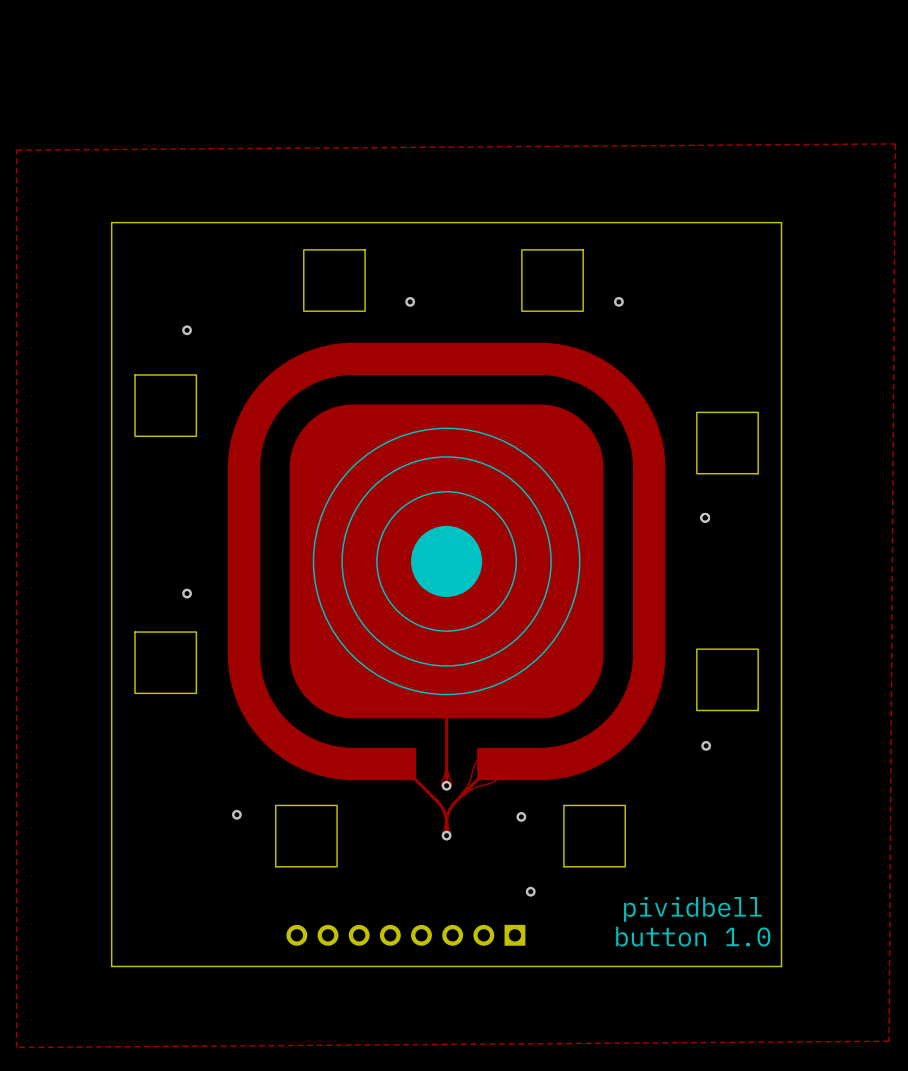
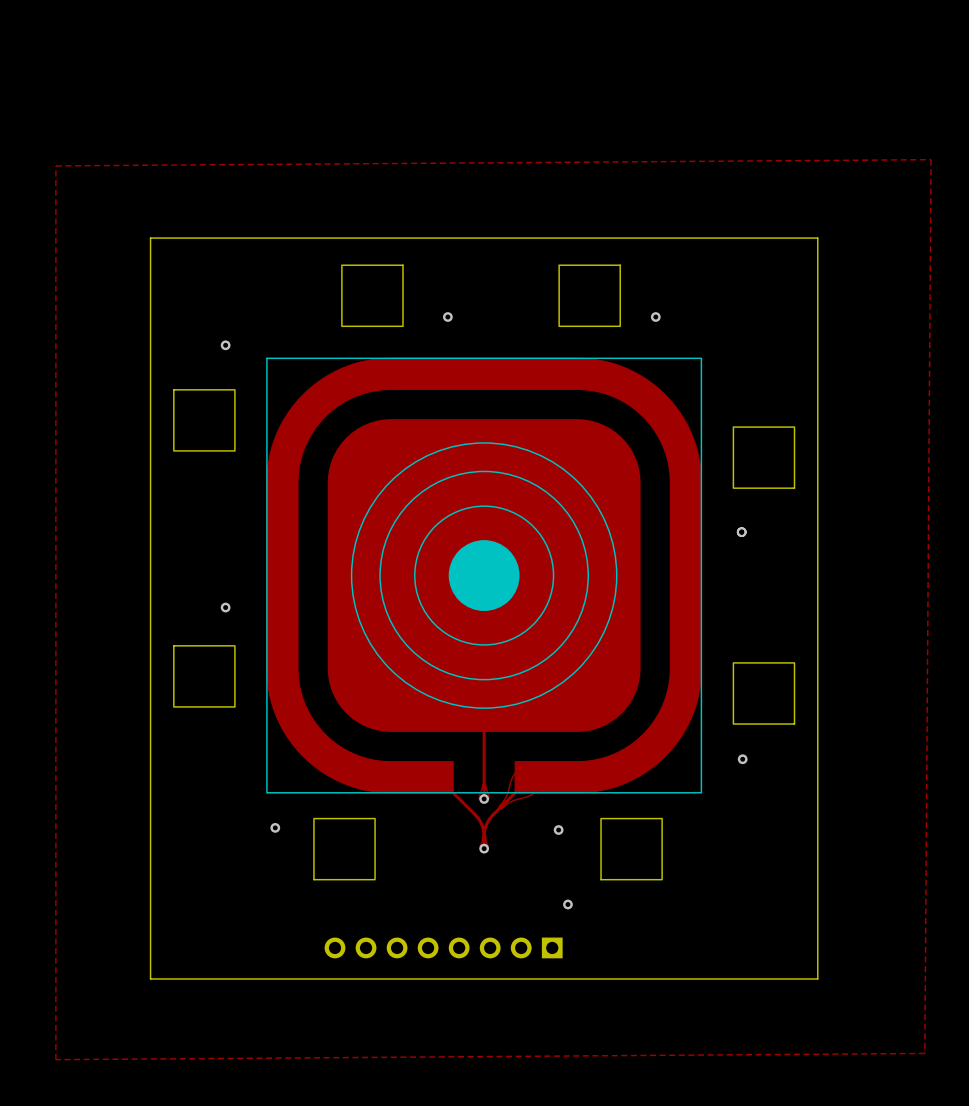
part footprint: [227, 342, 666, 781] -> [266, 357, 703, 794]
text: pividbell (692, 909) -> none
text: button 1.0 (693, 936) -> none

